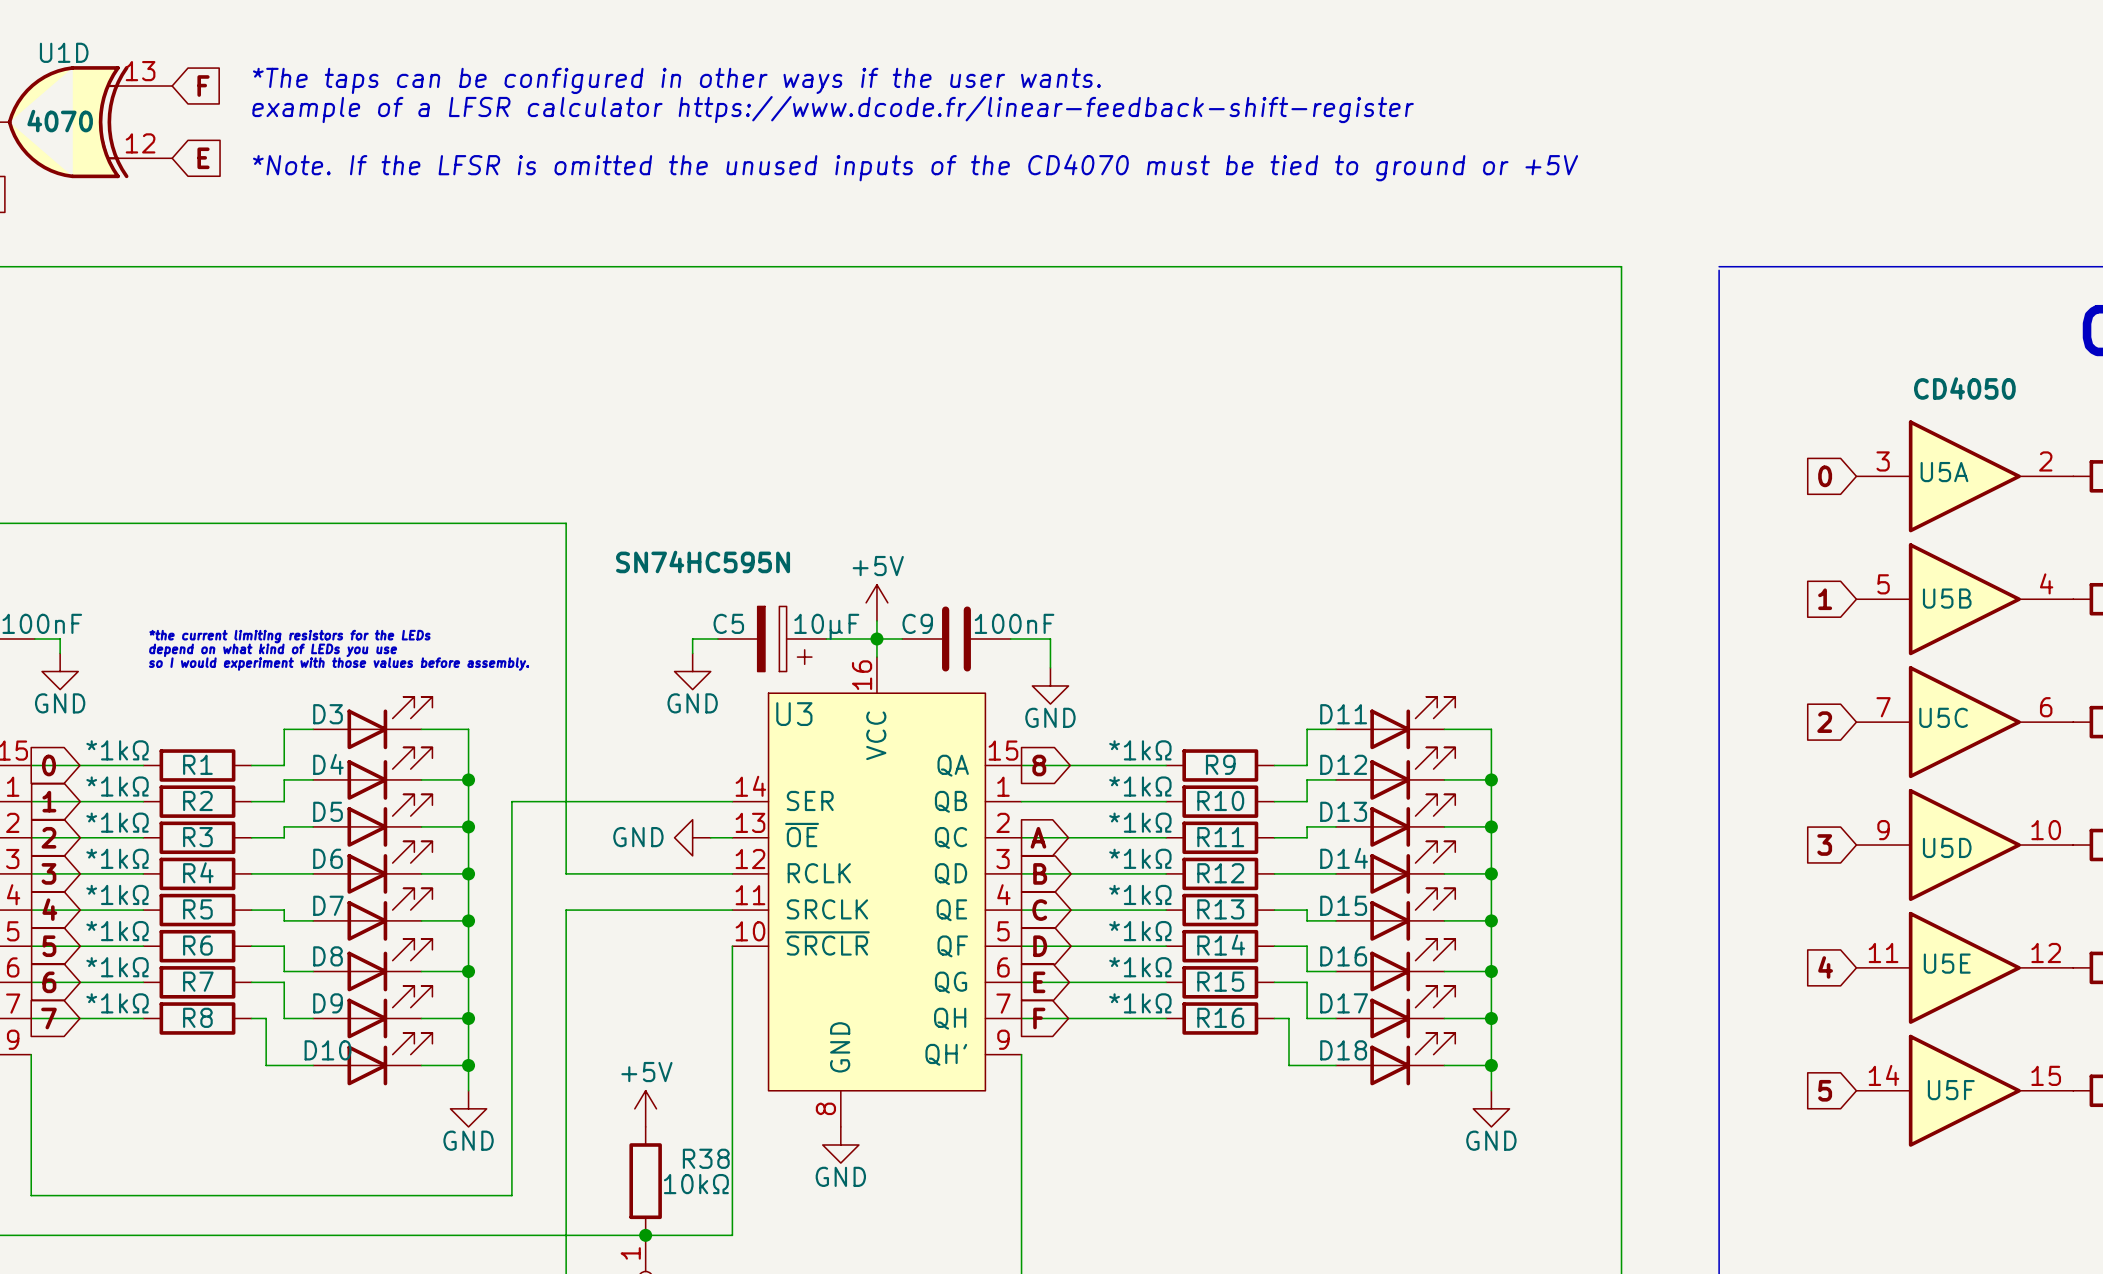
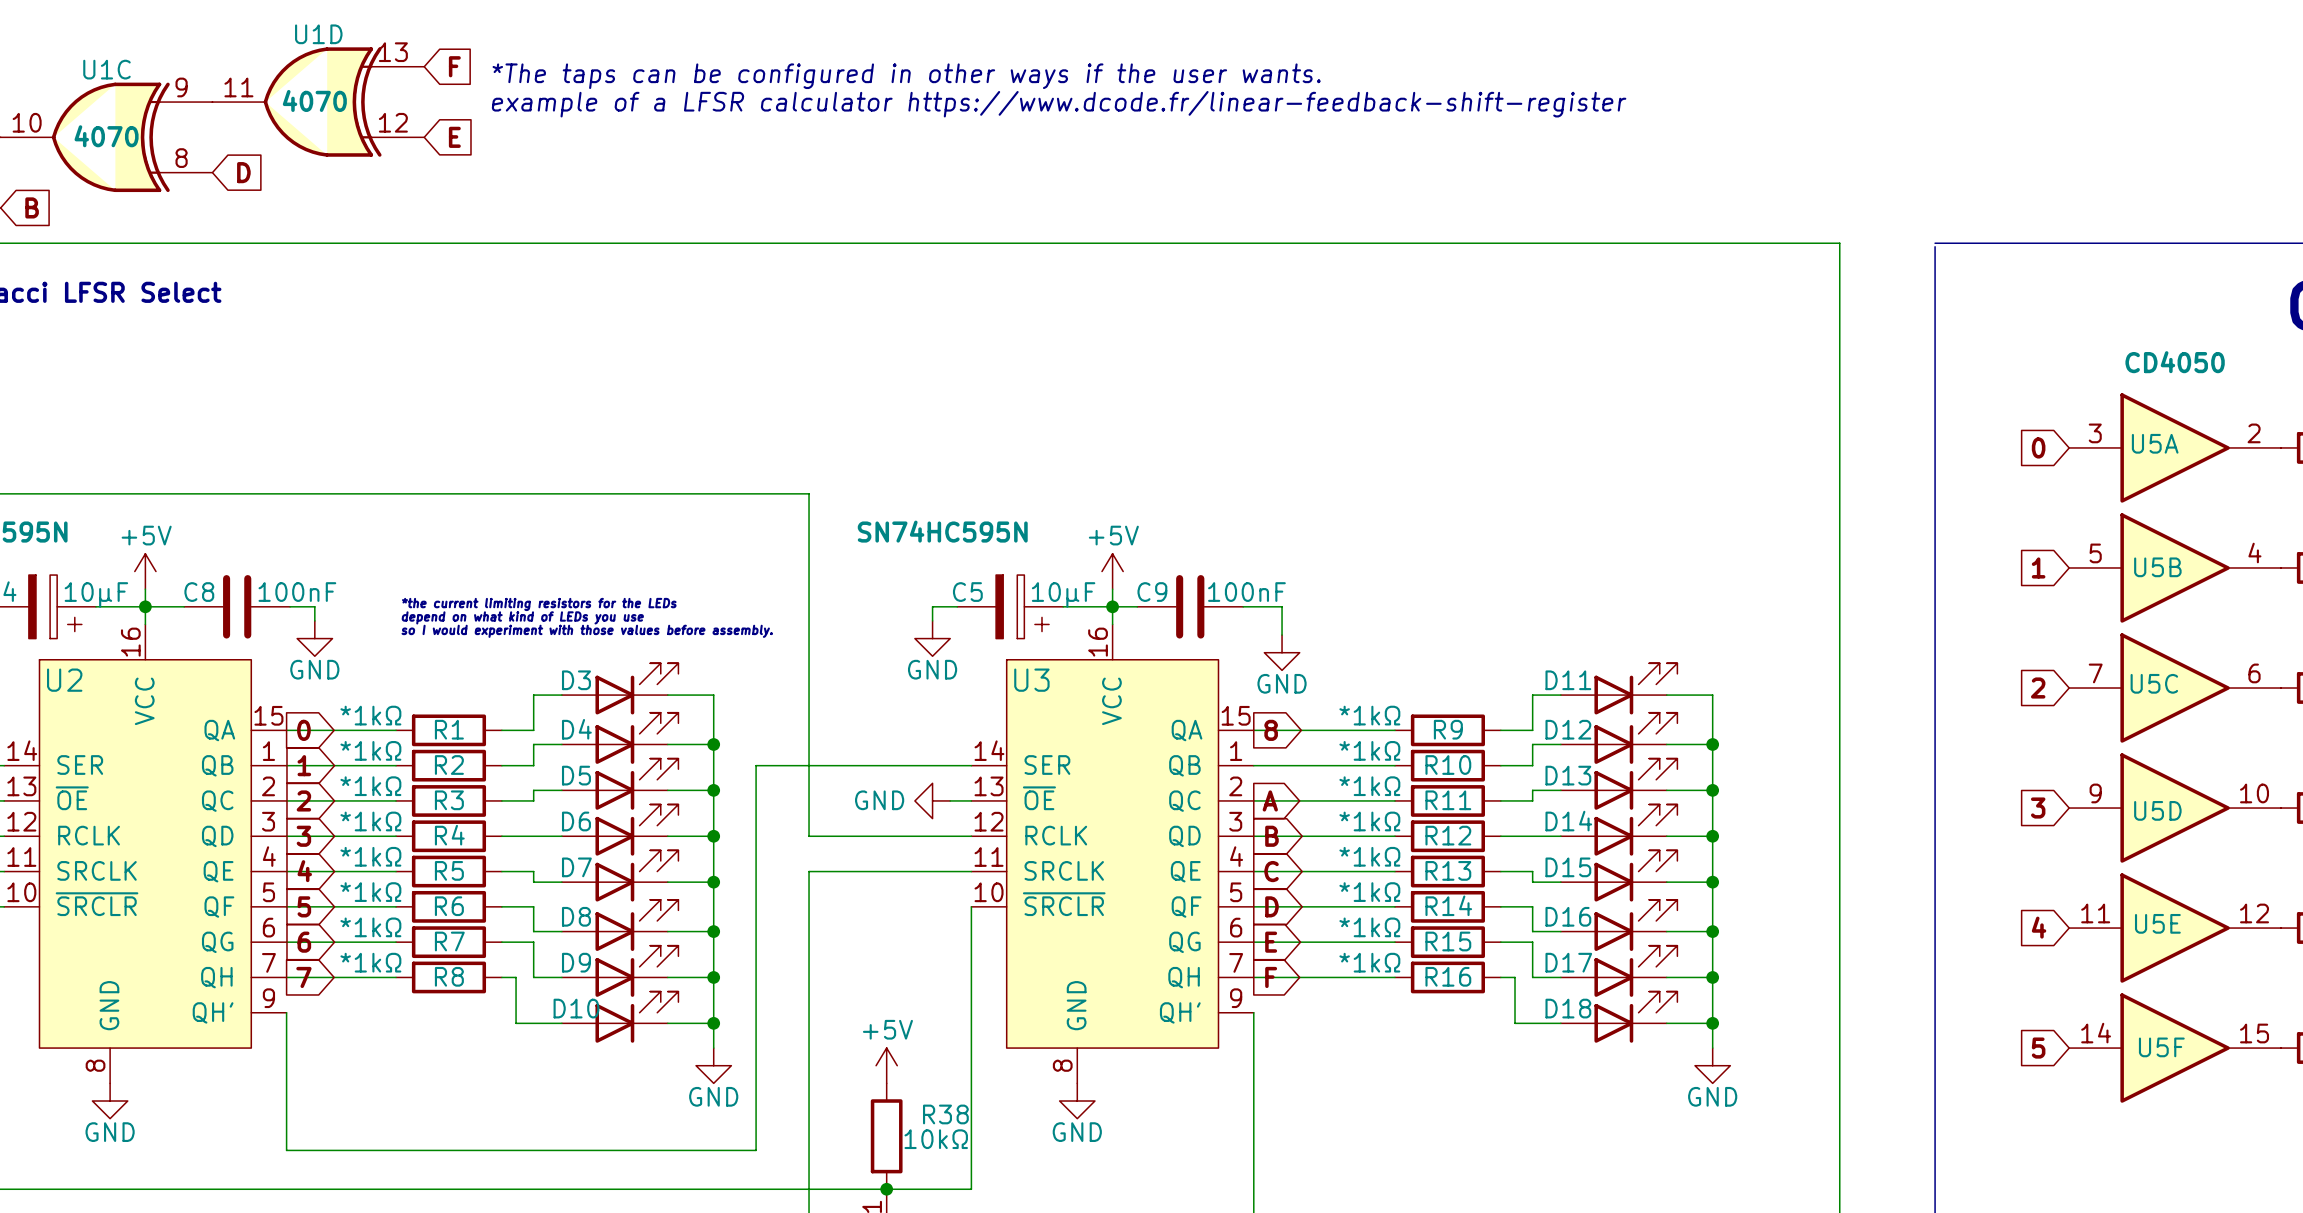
text position: *The taps can be configured in other ways if the user wants. (676, 80) -> *The taps can be configured in other ways if the user wants. (906, 76)
text position: example of a LFSR calculator https://www.dcode.fr/linear-feedback-shift-register (833, 109) -> example of a LFSR calculator https://www.dcode.fr/linear-feedback-shift-register (1059, 104)
text: *Note. If the LFSR is omitted the unused inputs of the CD4070 must be tied to ground or +5V (915, 167) -> none

